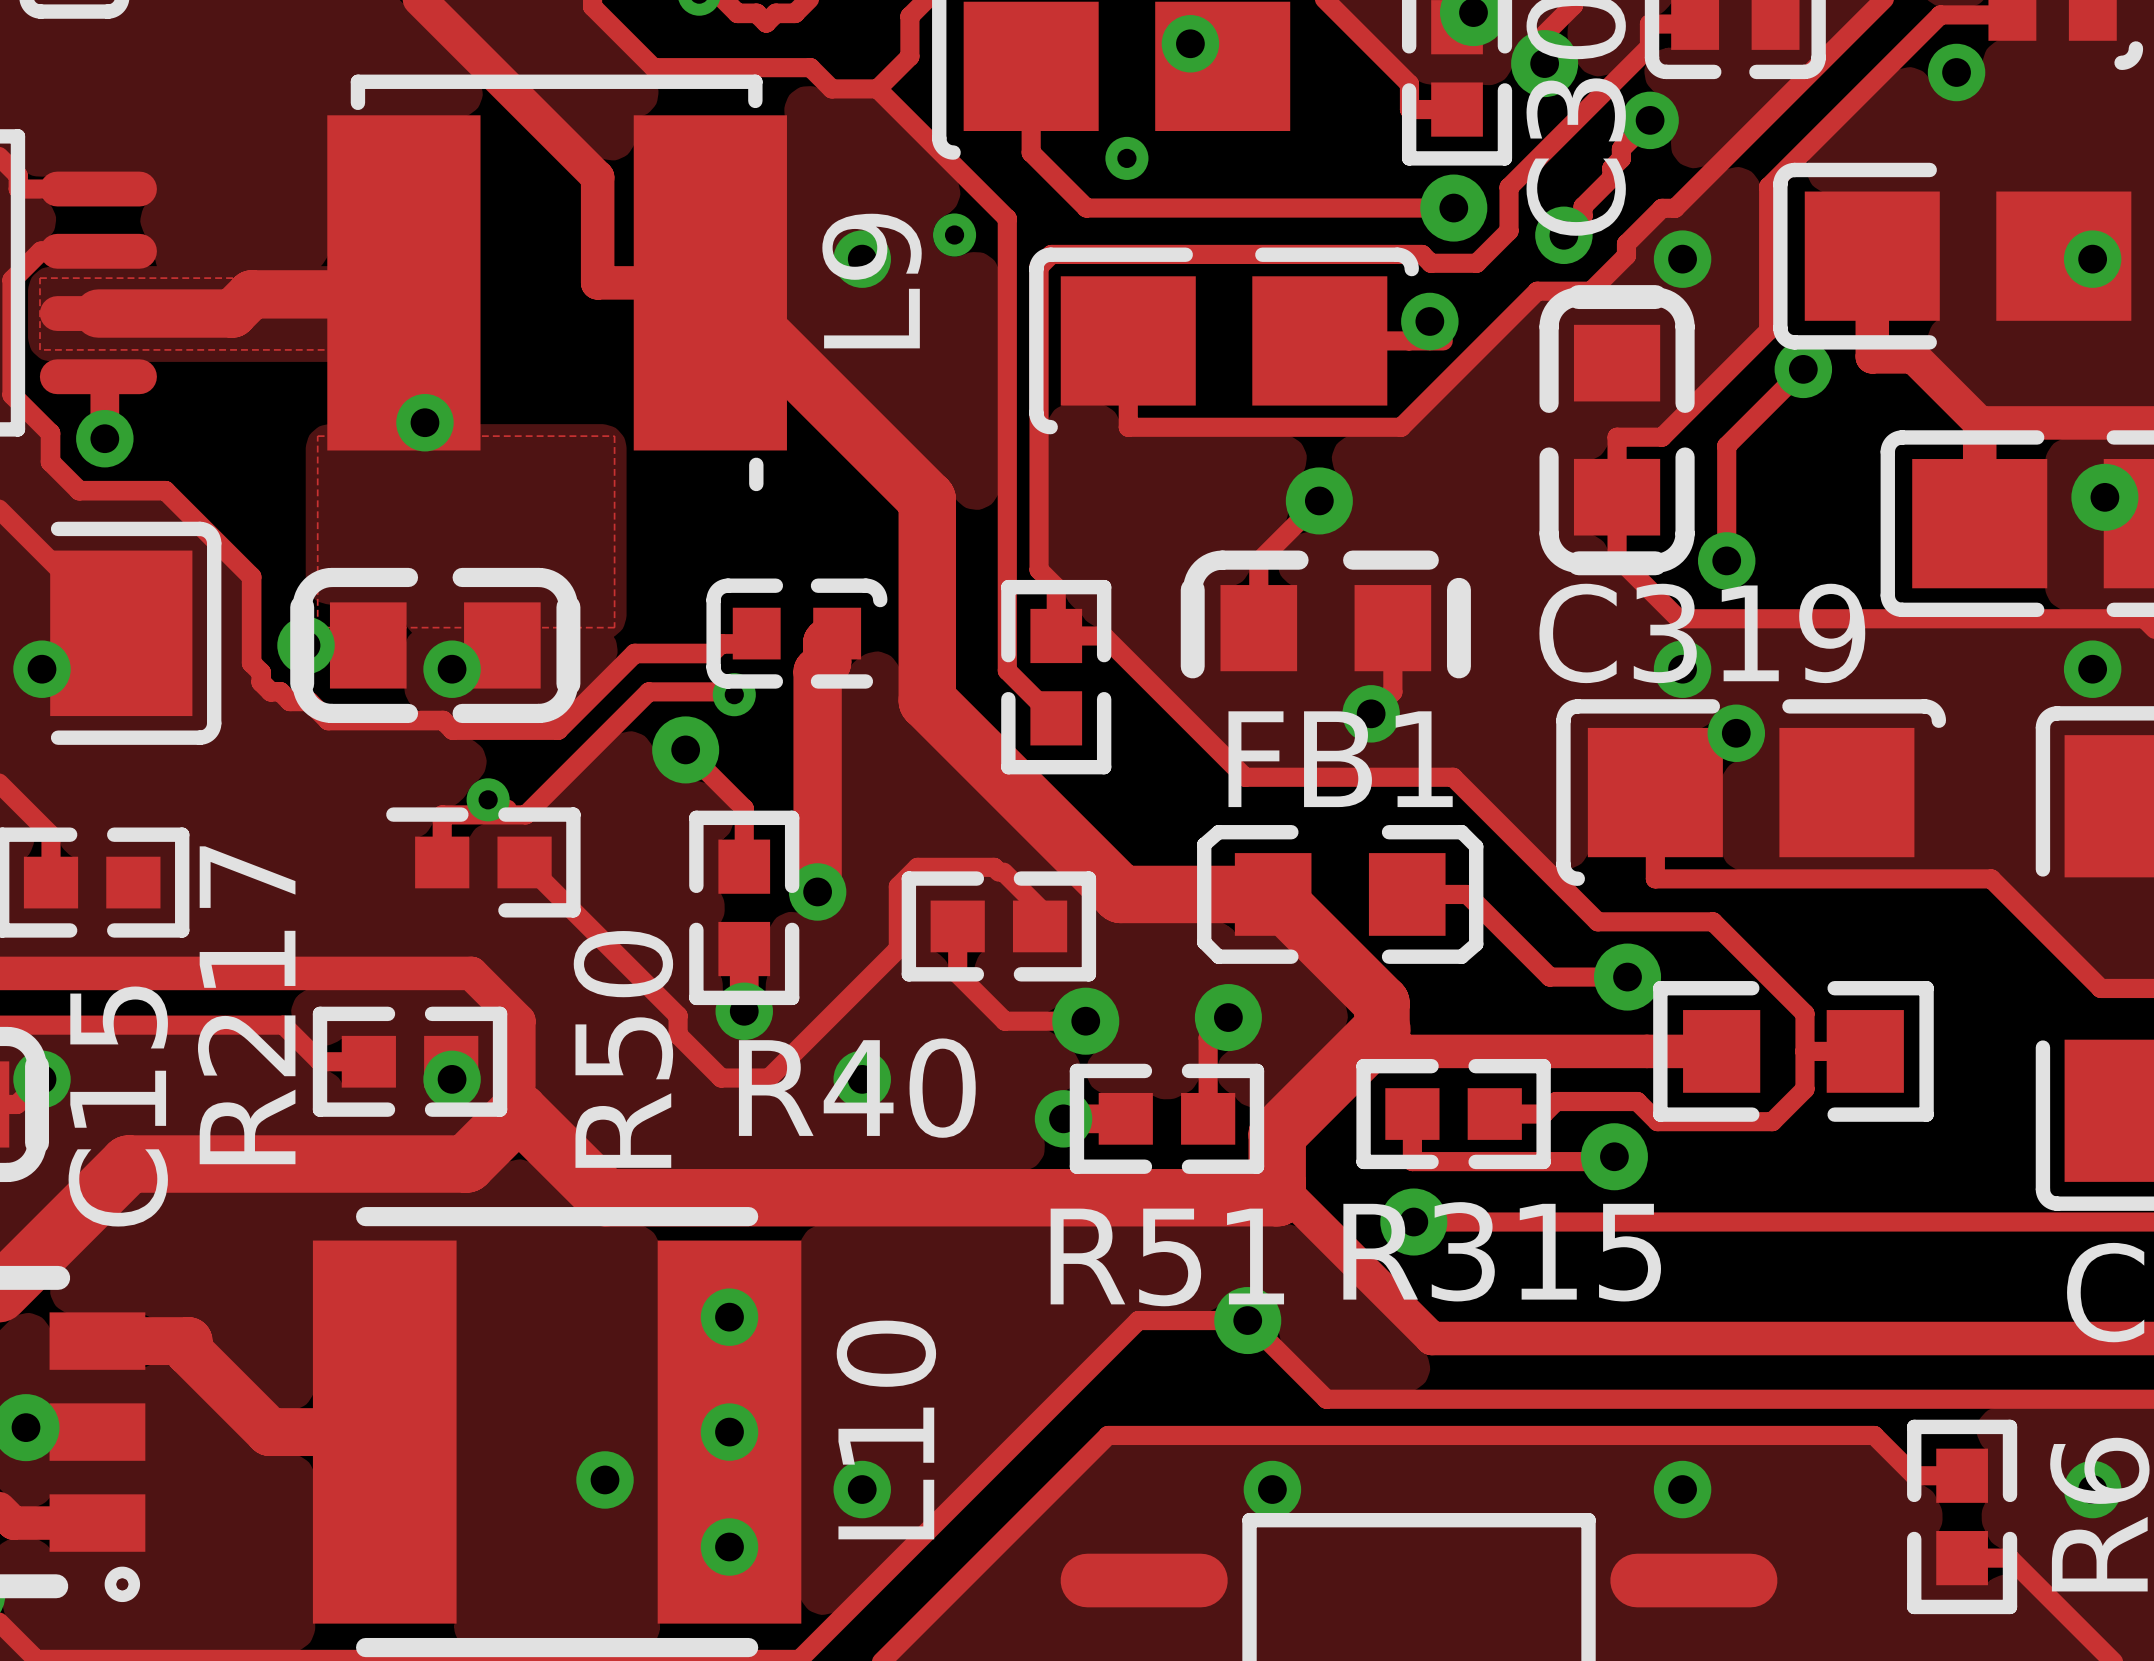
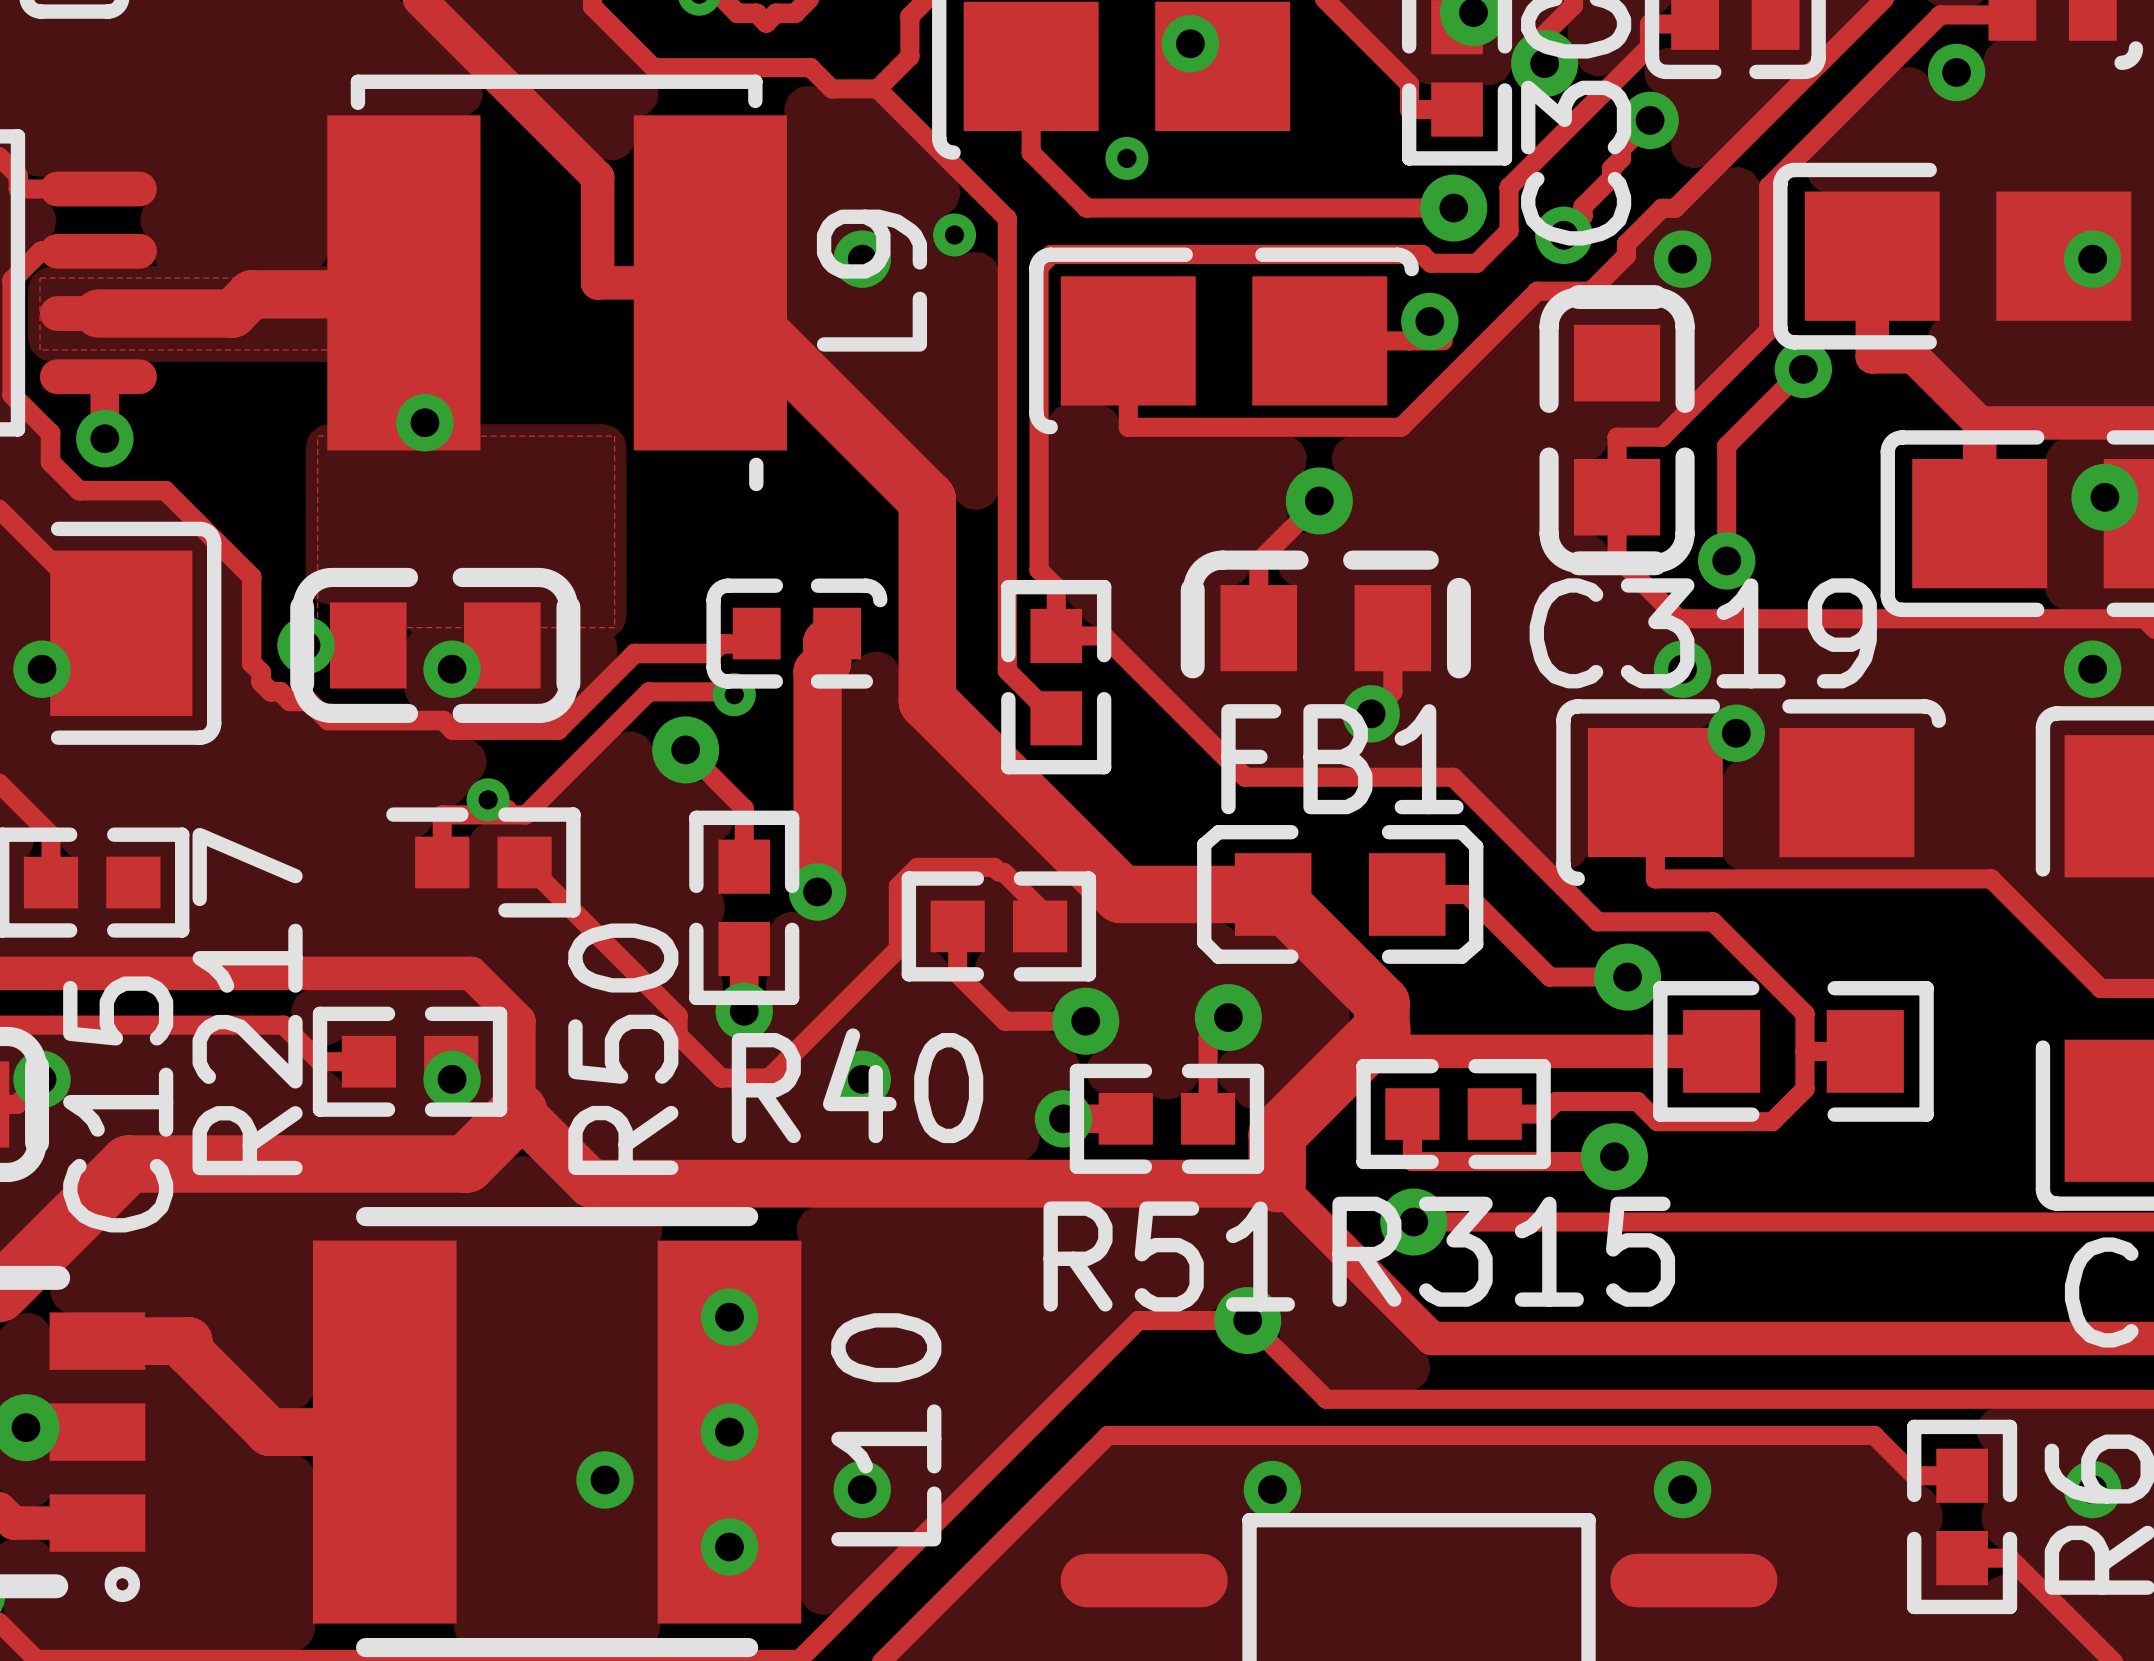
track: (466, 1164) (518, 1111) (605, 1197) (1277, 1197) (1277, 1183) -> (466, 1164) (518, 1111) (591, 1183) (1277, 1183)

